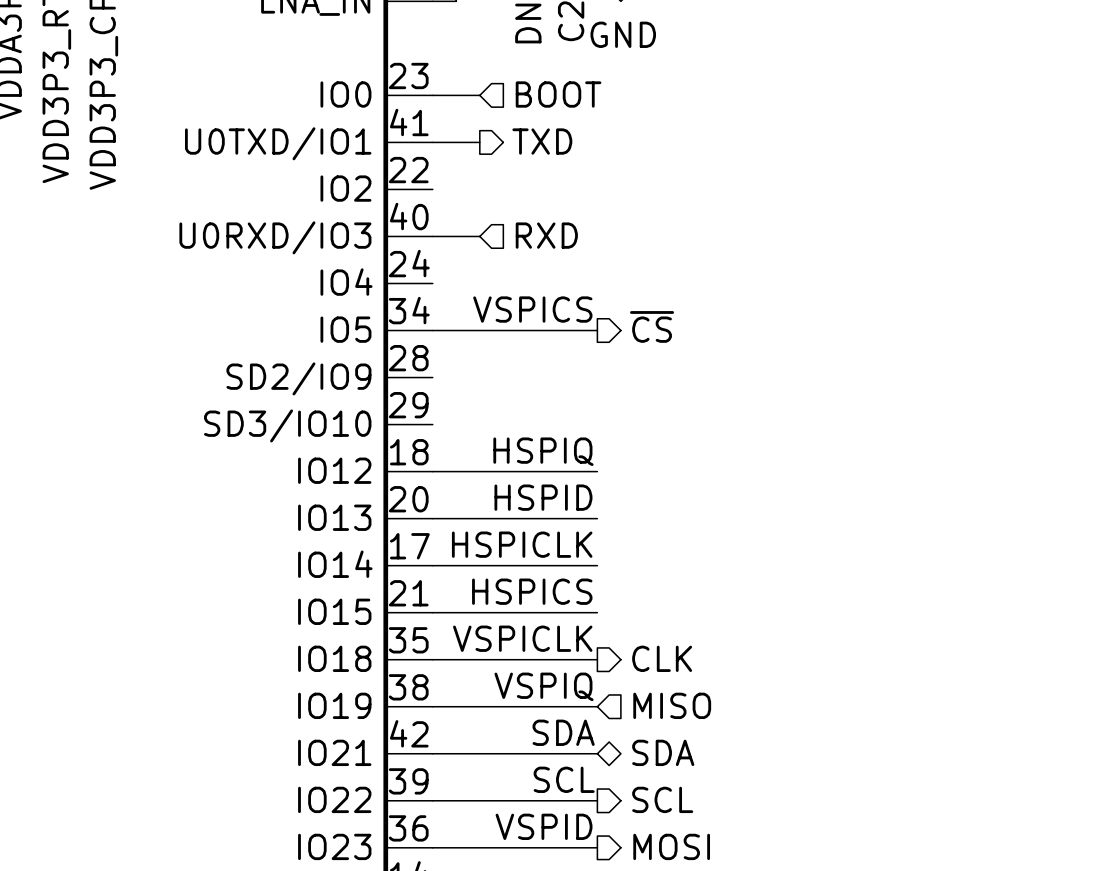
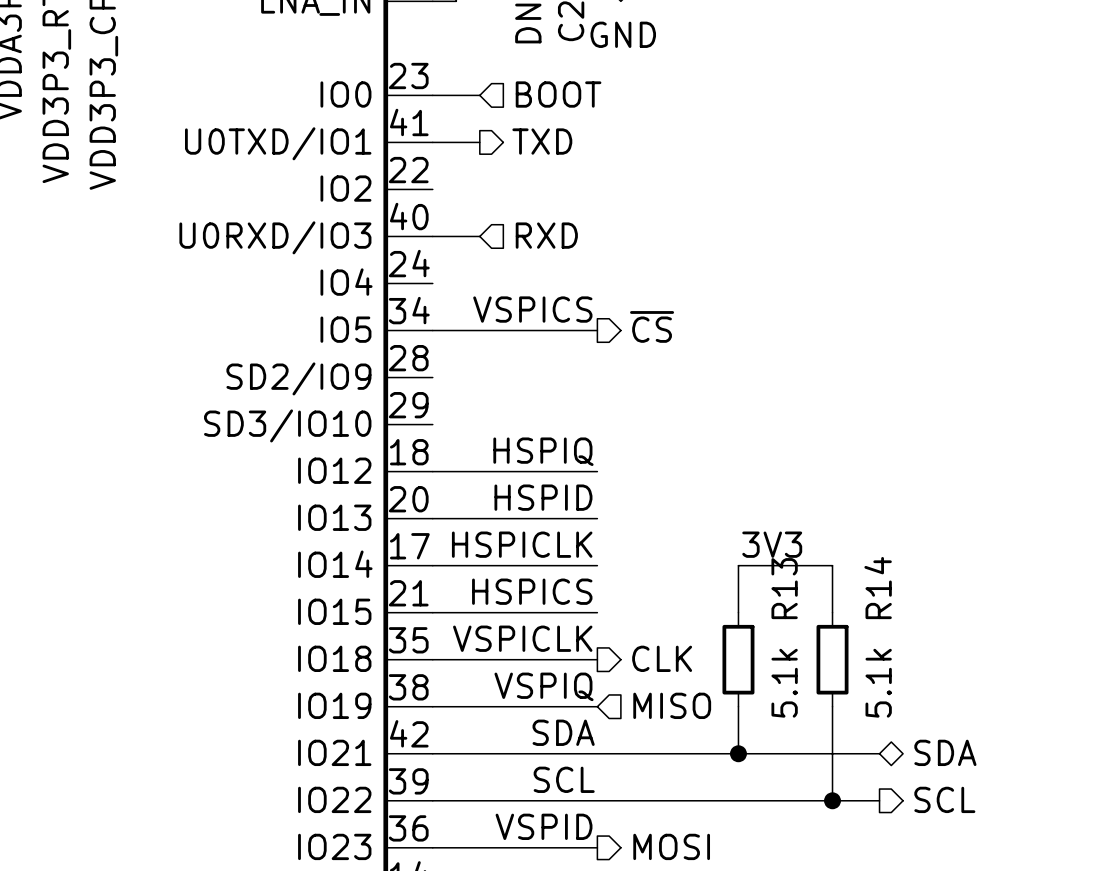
label: none -> 3V3 (772, 544)
wire: none -> (738, 612) (738, 565) (832, 565) (832, 612)
R13: none -> 5.1k (738, 659)
R14: none -> 5.1k (832, 659)
wire: none -> (738, 706) (738, 753)
wire: none -> (832, 706) (832, 800)
hierarchical label position: SDA (663, 752) -> SDA (945, 752)
wire: none -> (597, 753) (879, 753)
junction: none -> (738, 753)
hierarchical label position: SCL (662, 799) -> SCL (944, 799)
wire: none -> (597, 800) (879, 800)
junction: none -> (832, 800)

